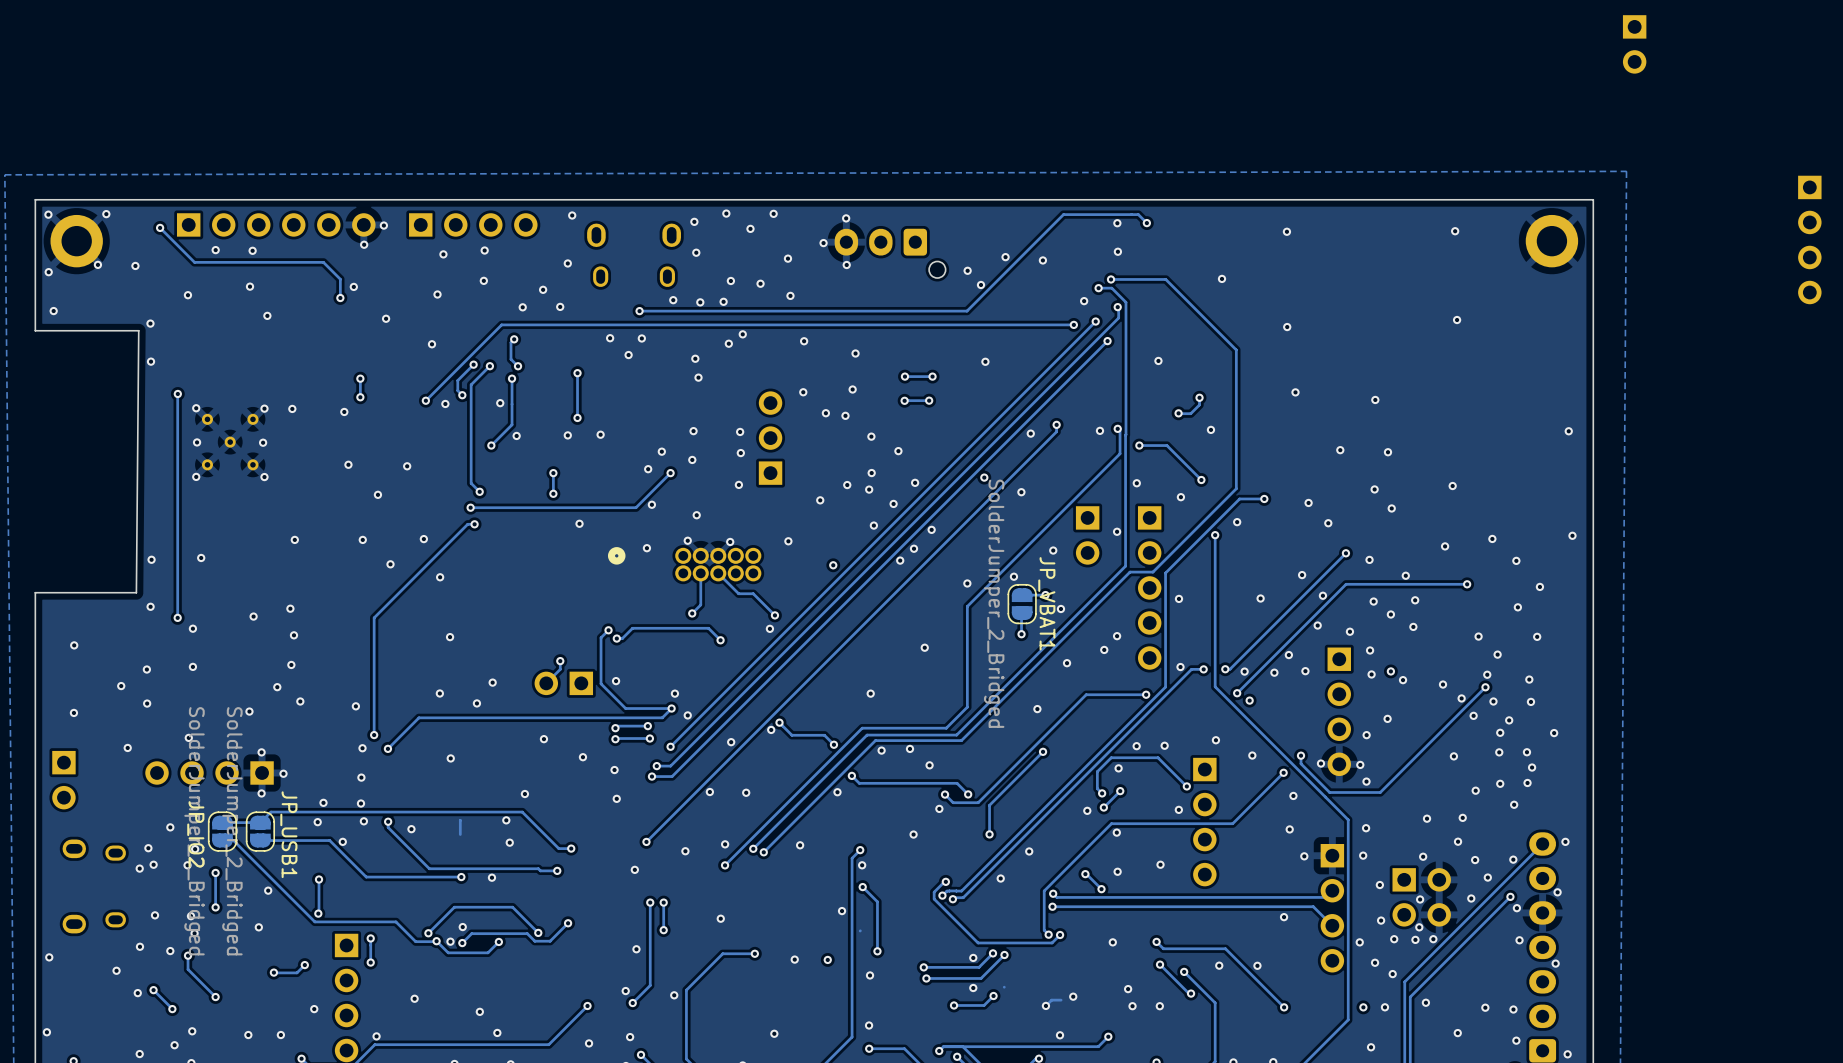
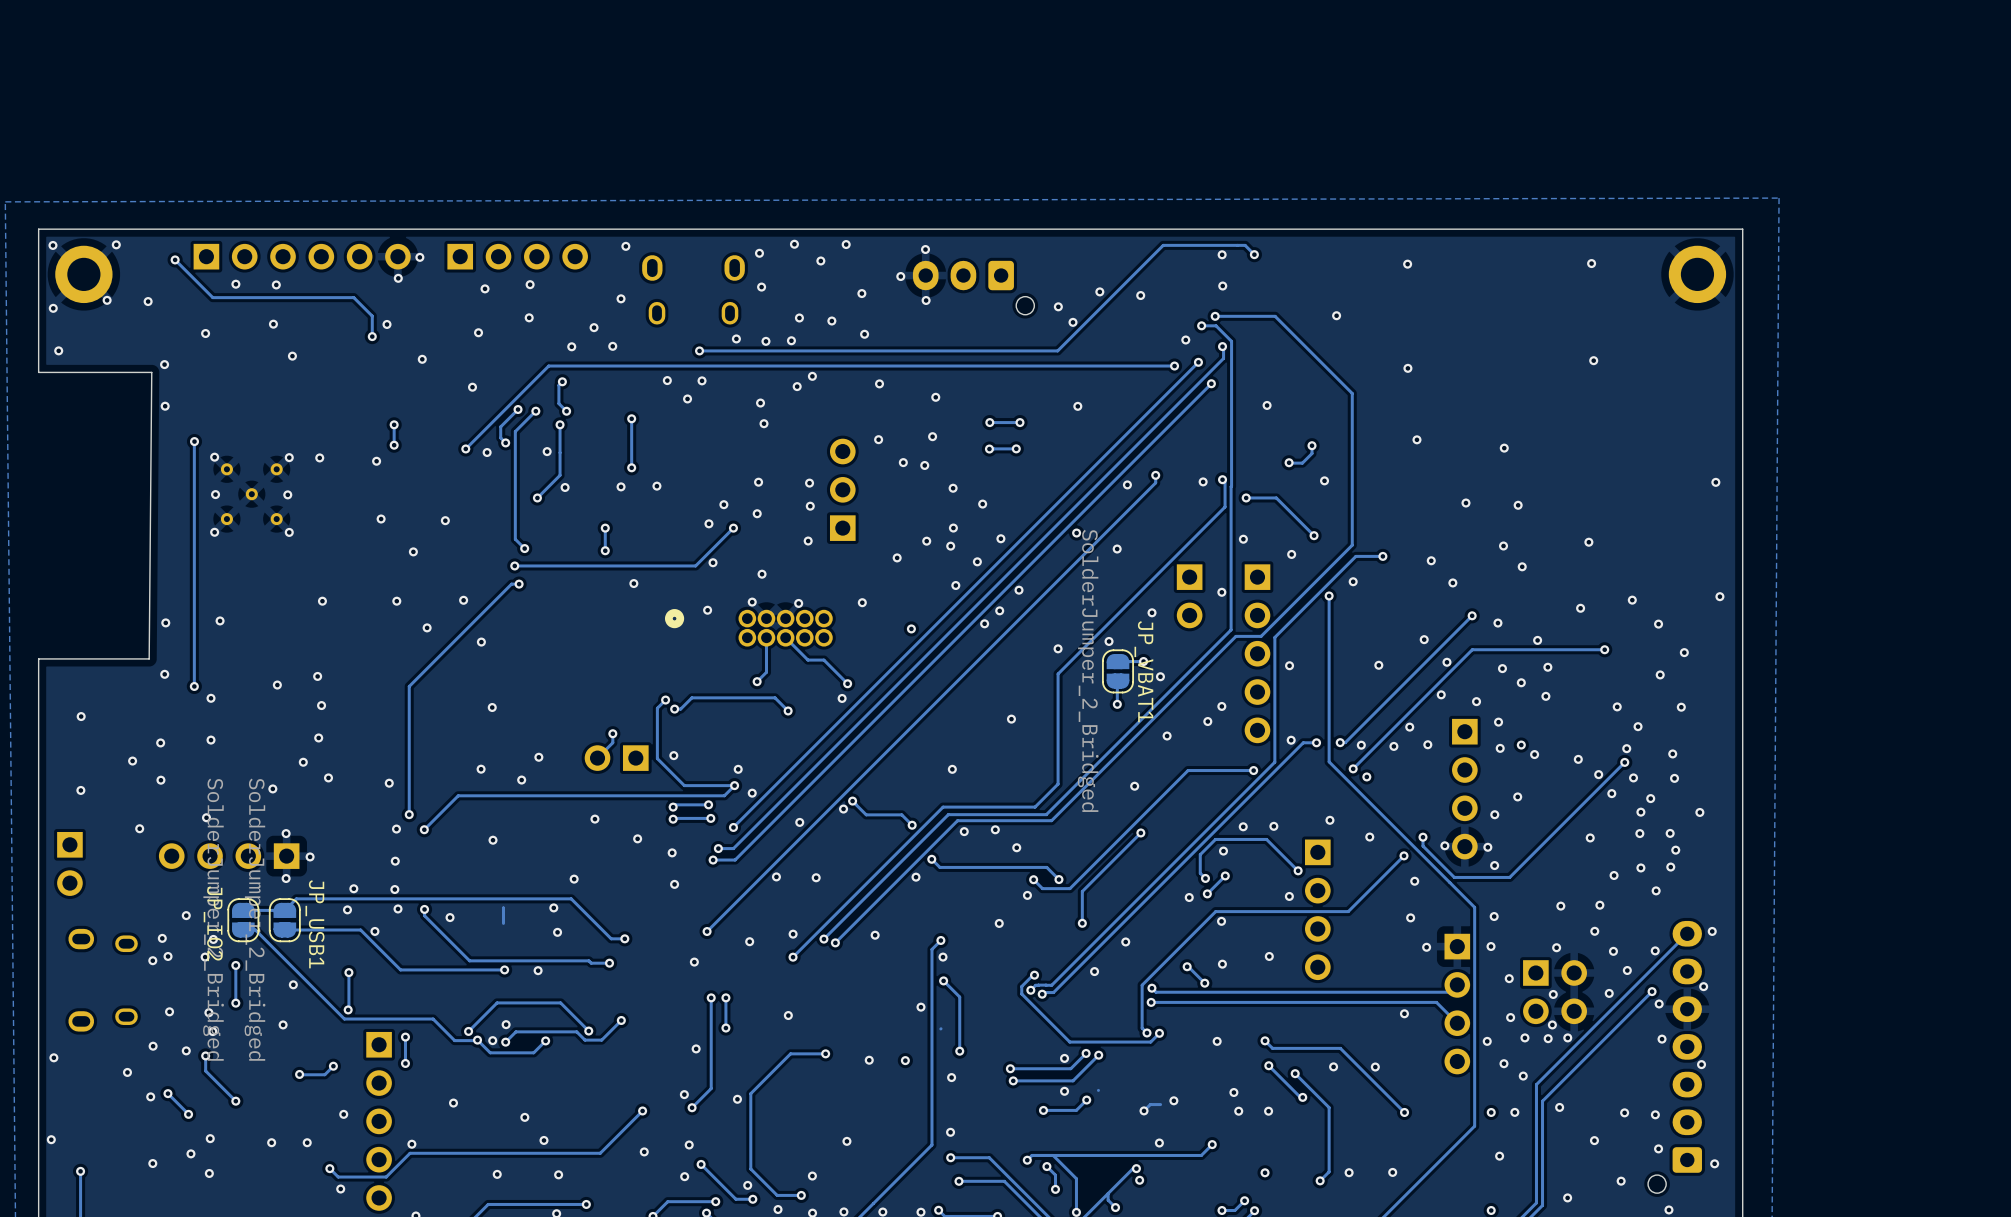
part: (1634, 44) -> none
part: (1809, 239) -> none

